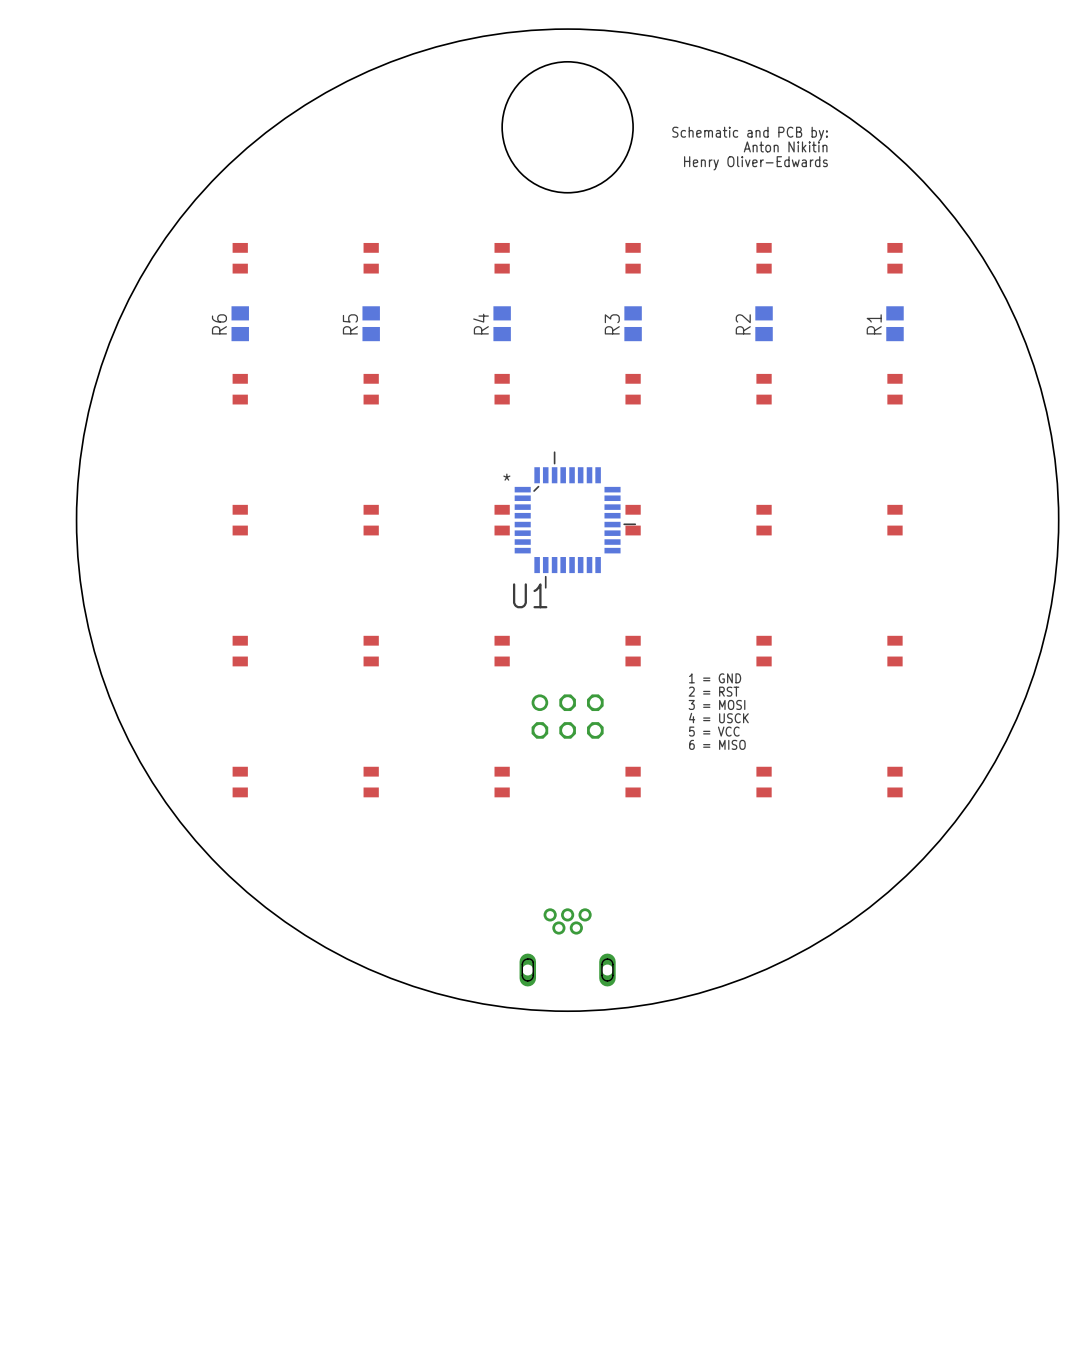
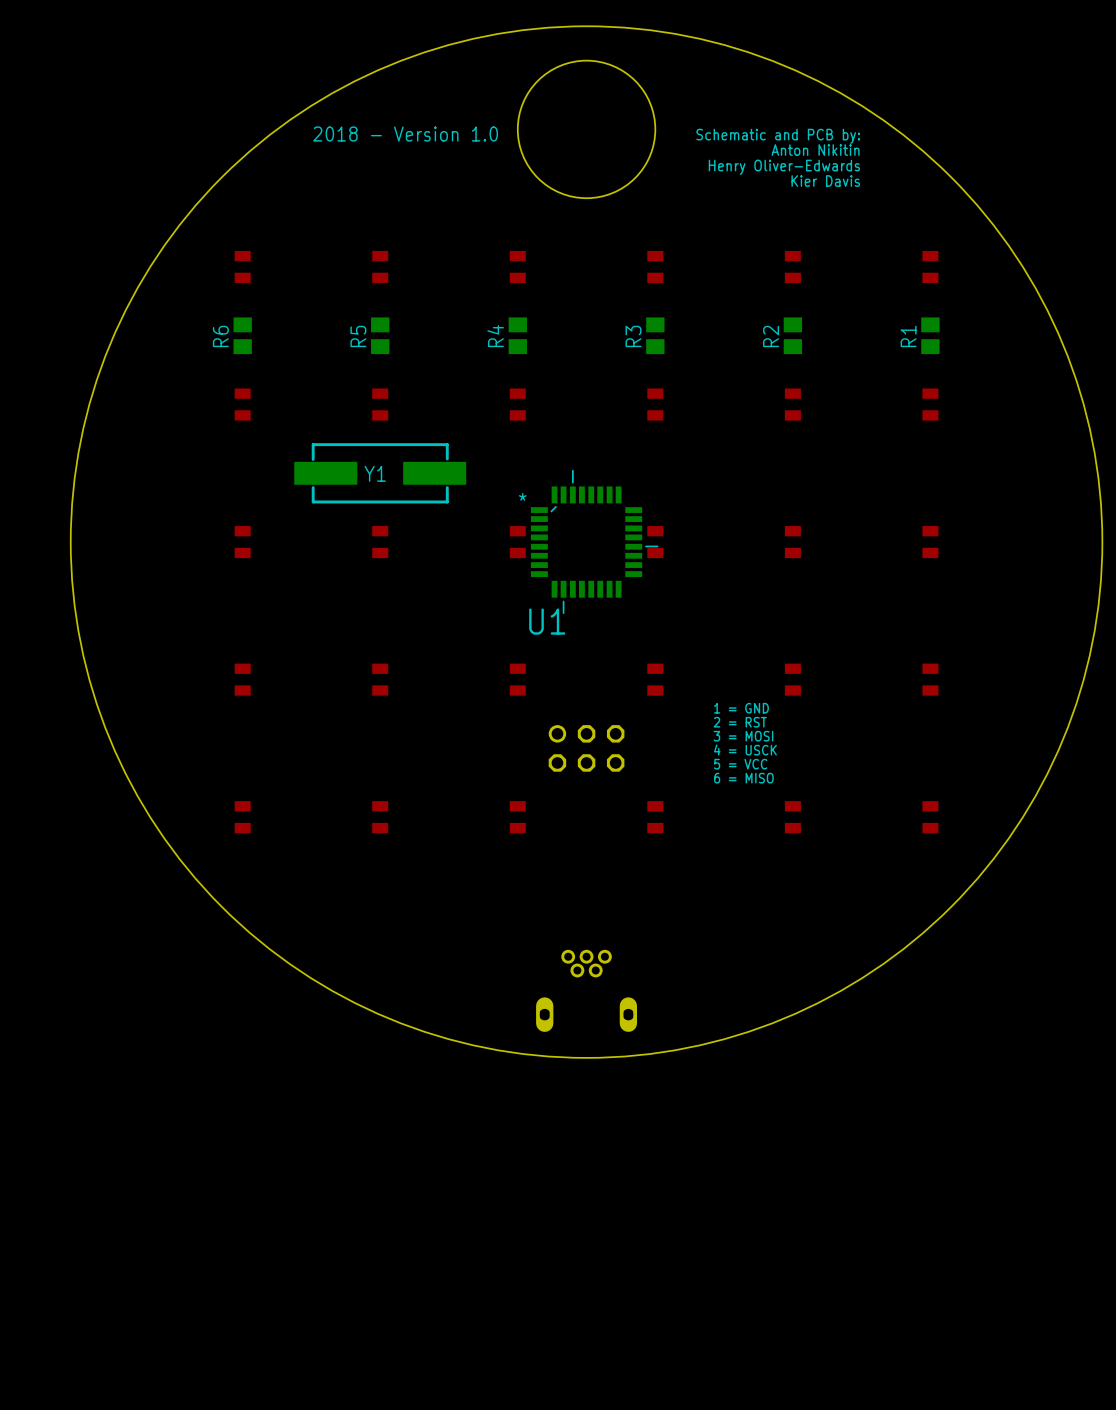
text: none -> 2018 - Version 1.0 (405, 134)
text: none -> Kier Davis (825, 181)
Y1: none -> (380, 473)

